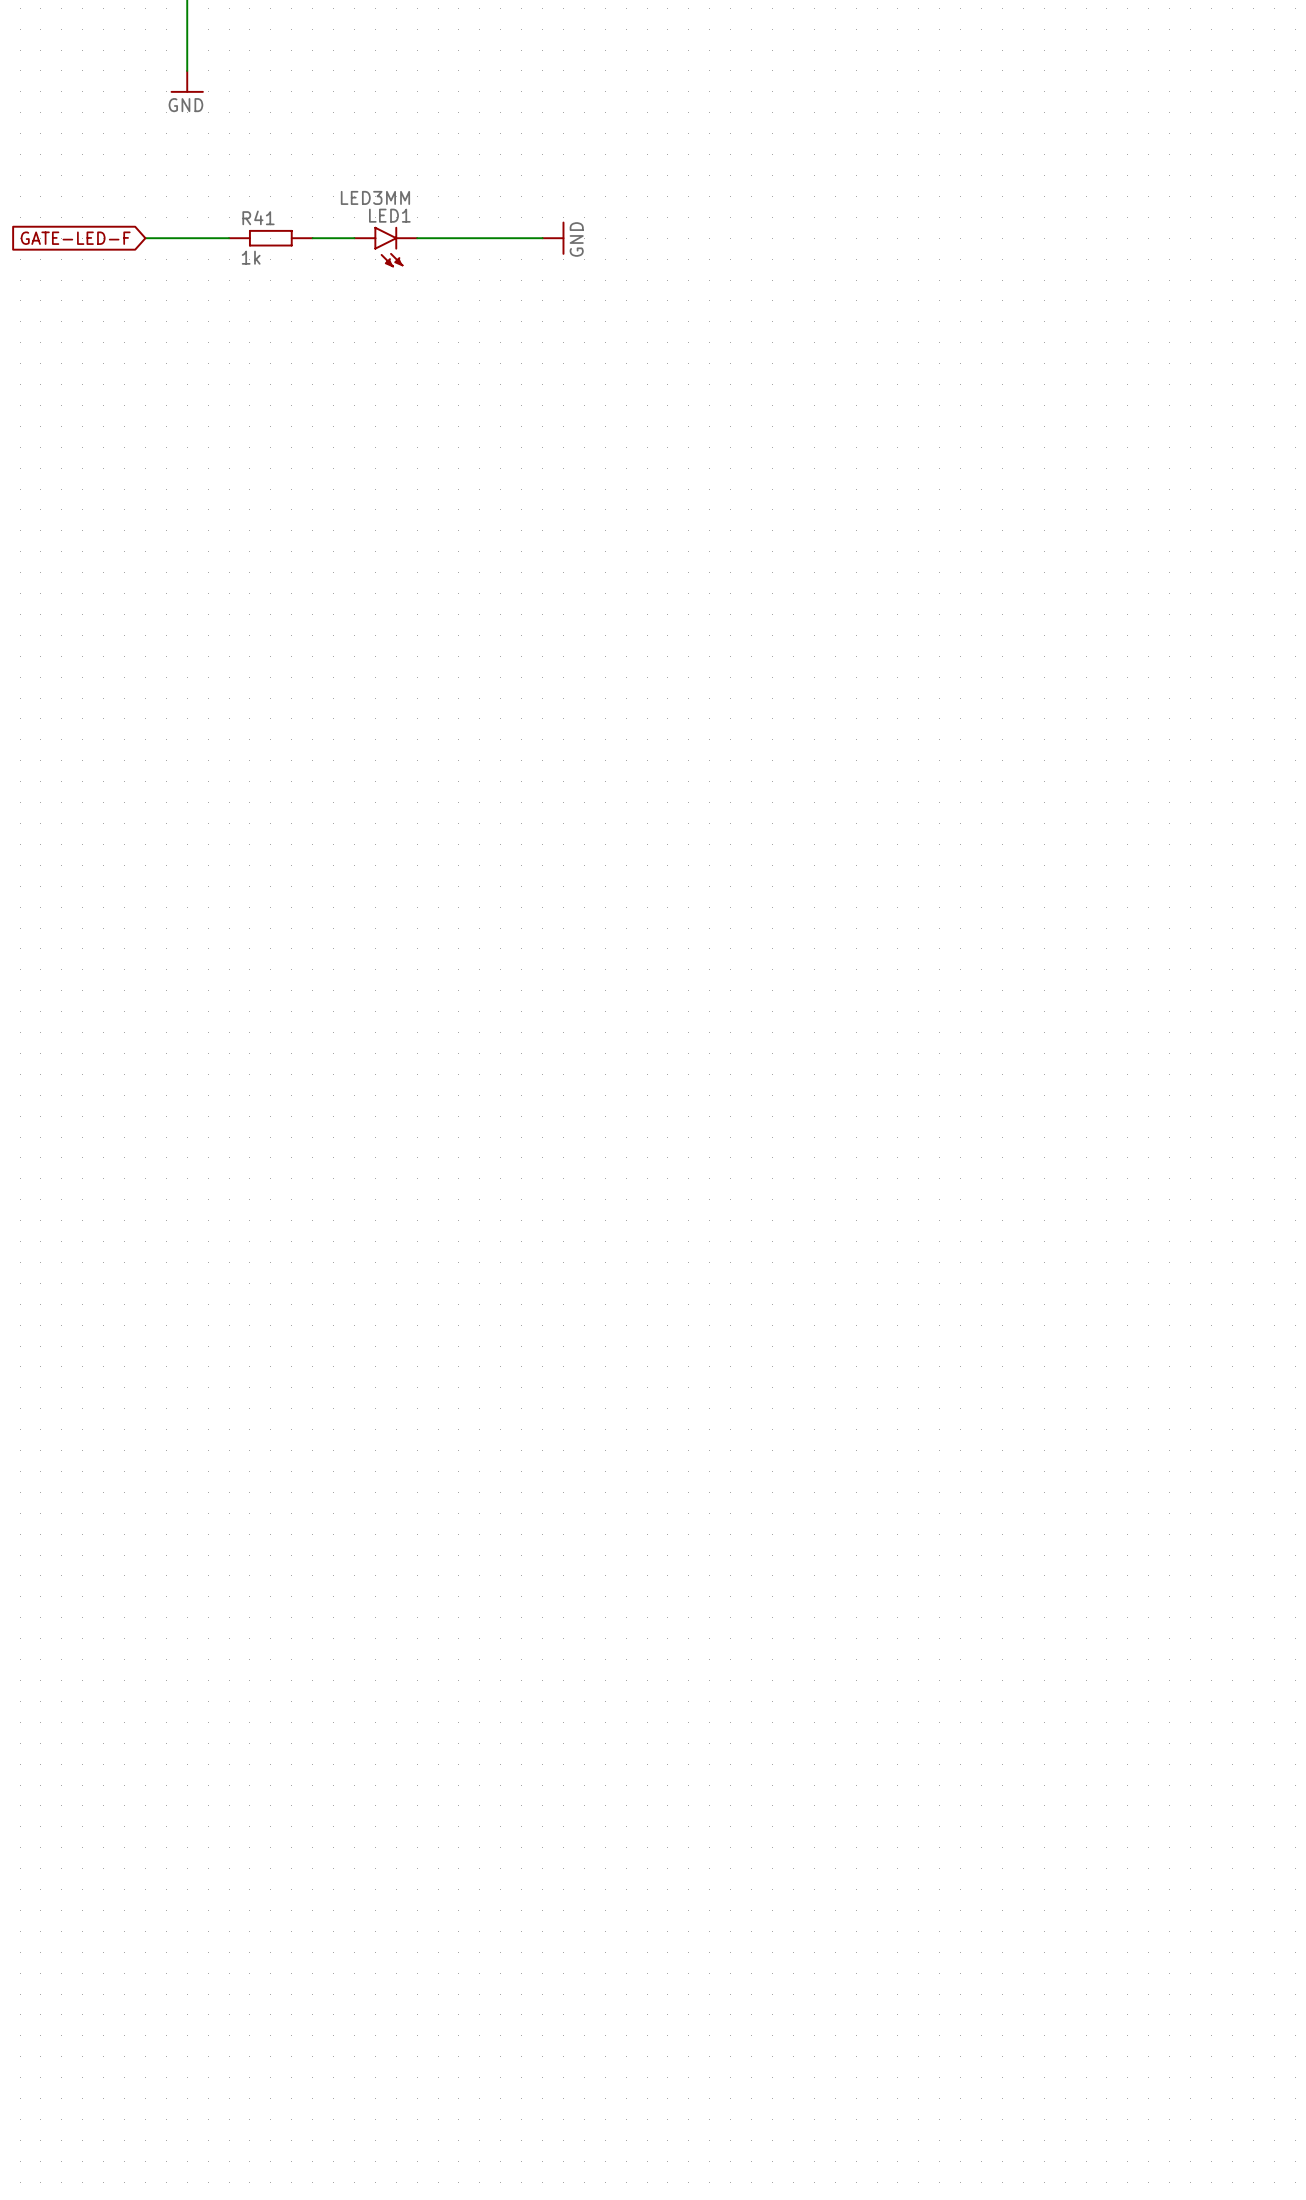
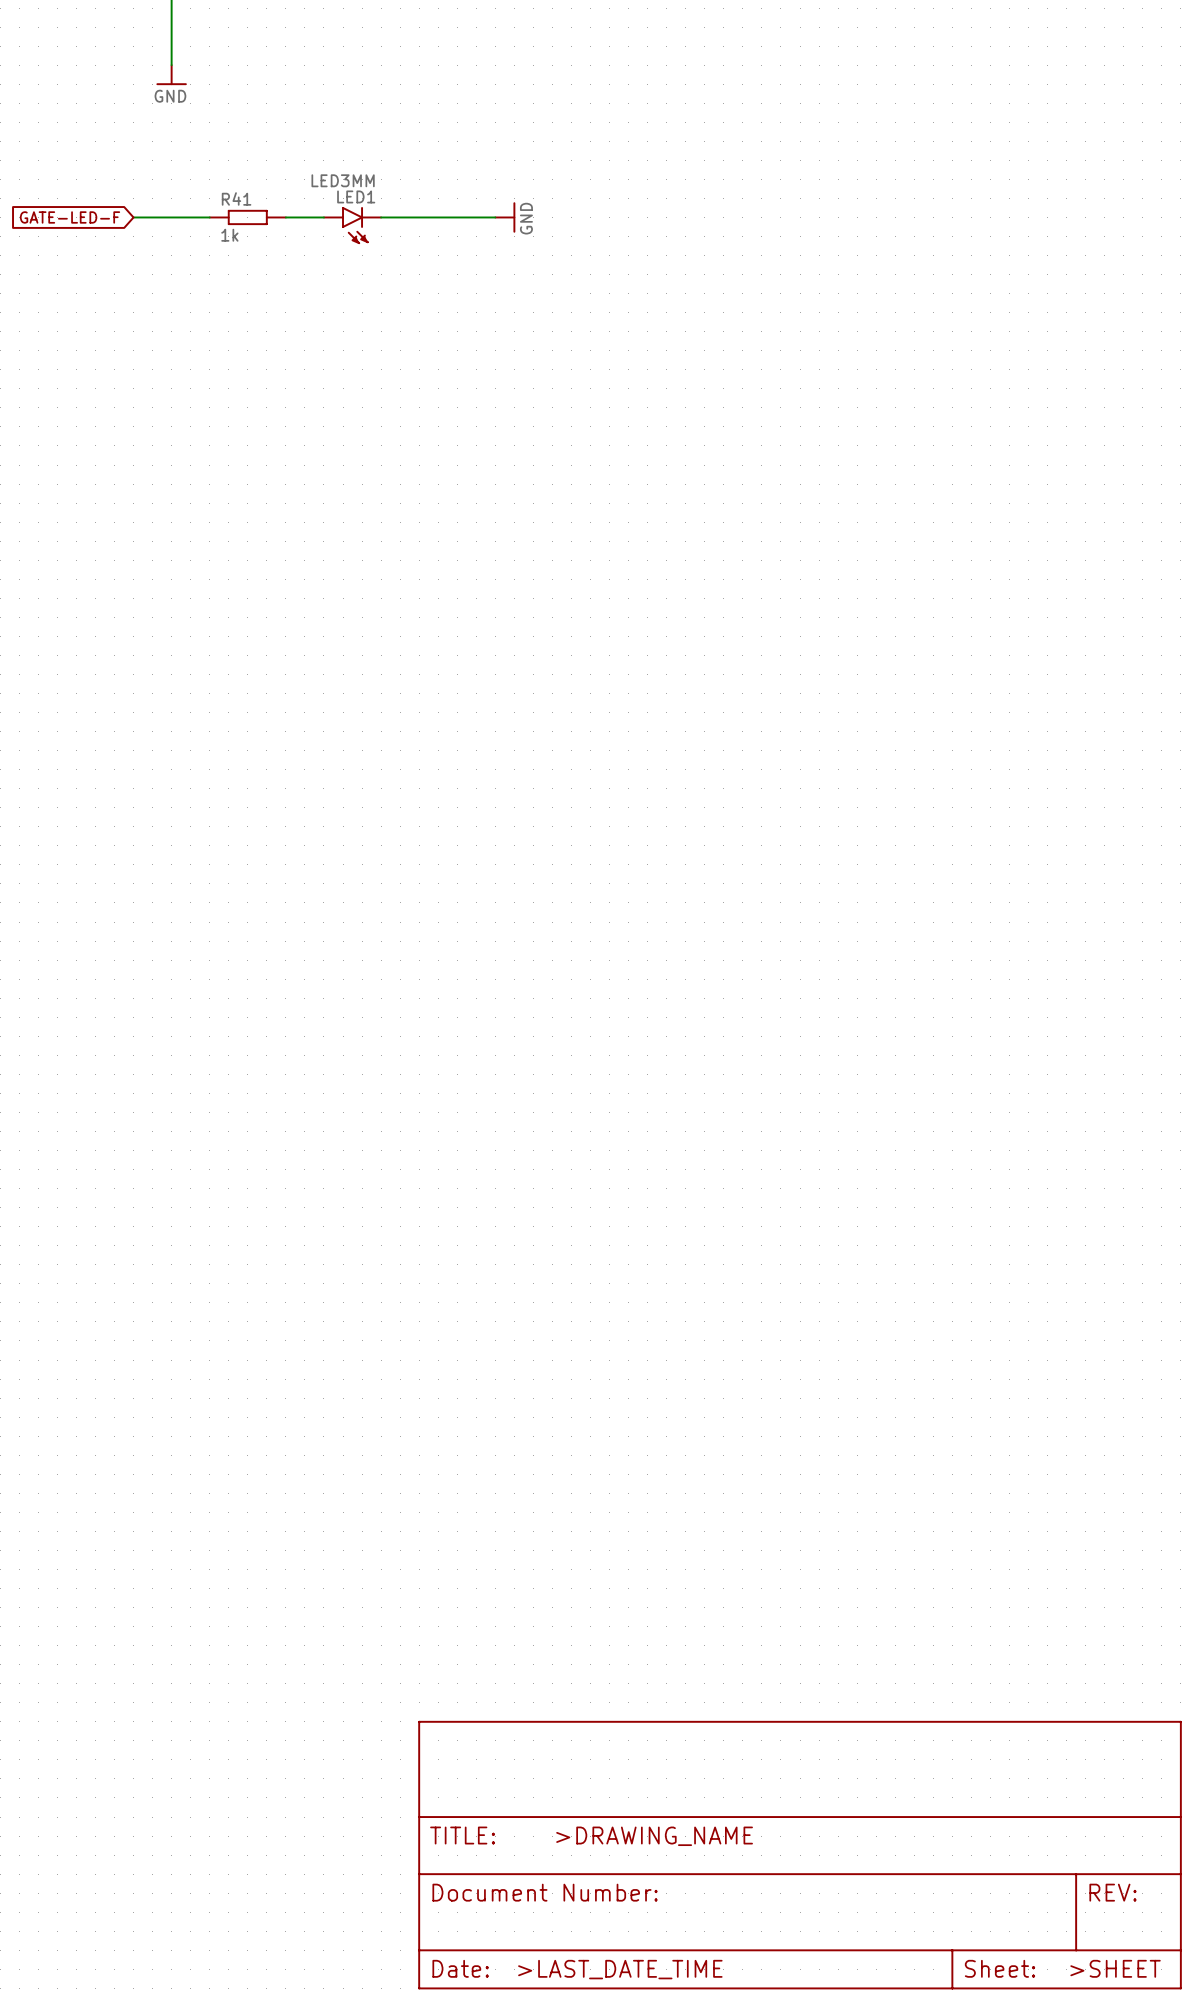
power symbol: none -> (800, 1855)

